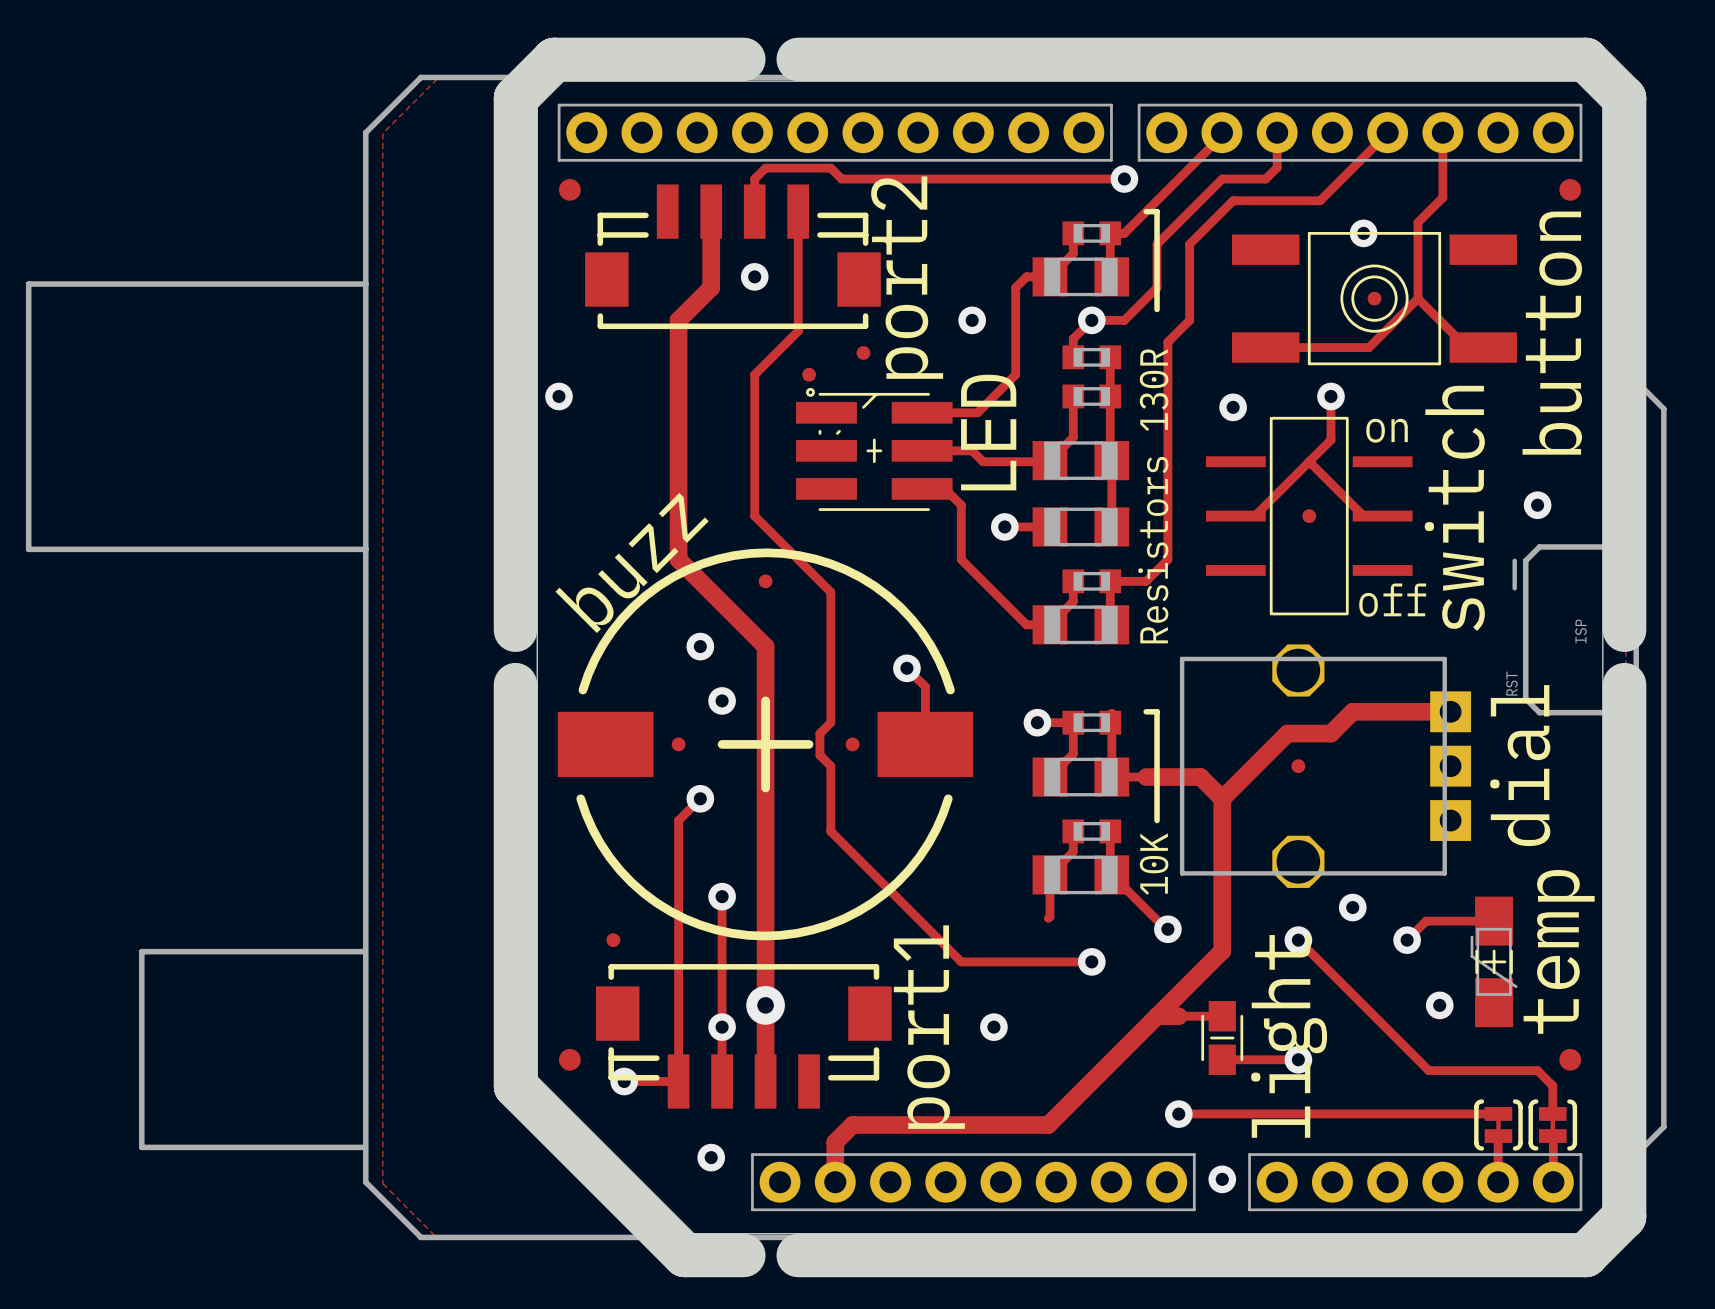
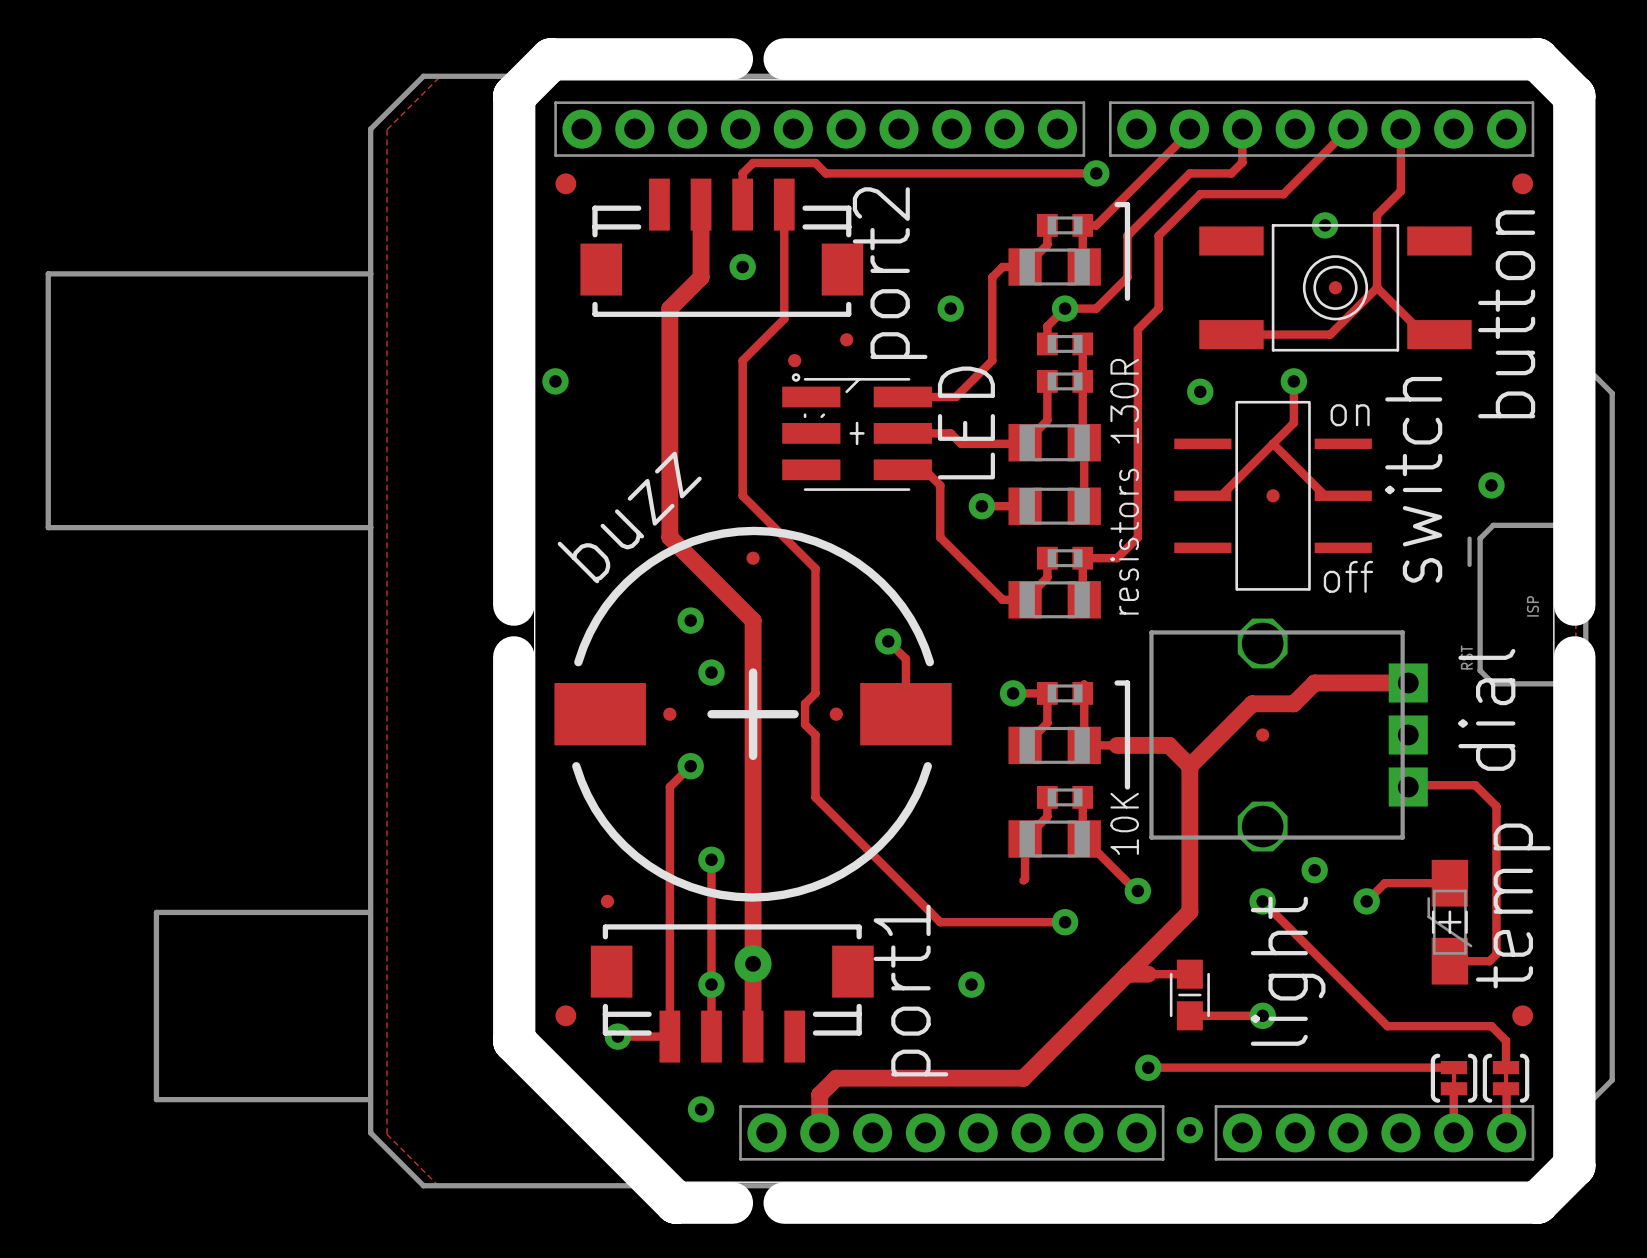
text: Resistors 130R (1153, 496) -> resistors 130R (1124, 486)
text position: buzz (632, 562) -> buzz (629, 517)
text position: dial (1520, 765) -> dial (1486, 709)
track: none -> (1411, 785) (1475, 785) (1496, 806) (1496, 954) (1489, 961) (1449, 961)
via: (1439, 1005) -> none
text position: light (1289, 1036) -> light (1288, 971)

